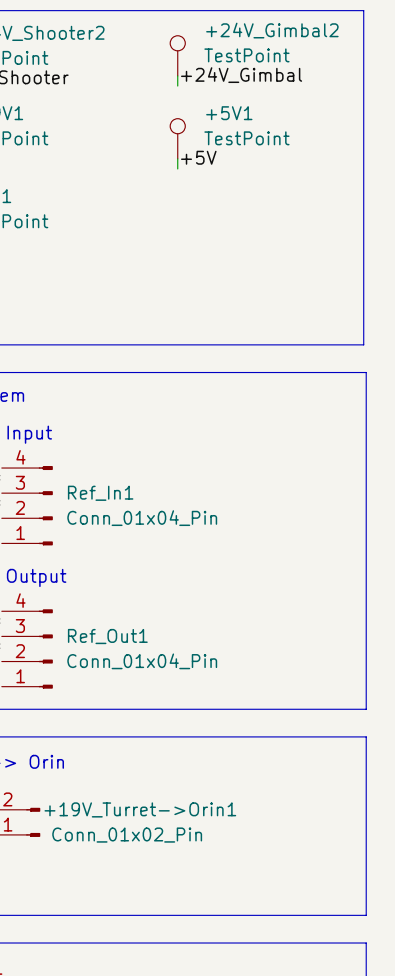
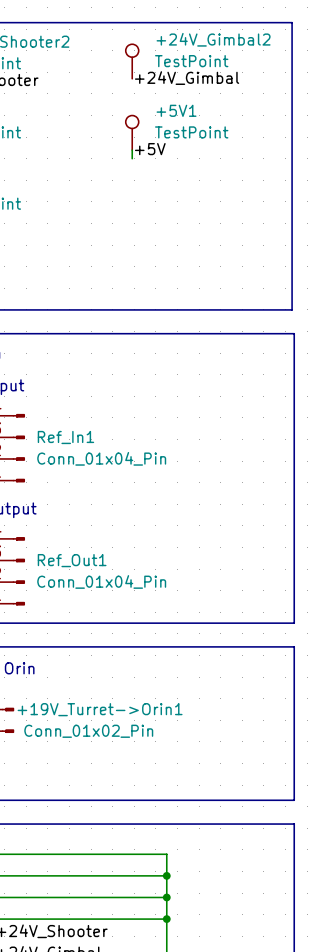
wire: (177, 75) (177, 86) -> none

